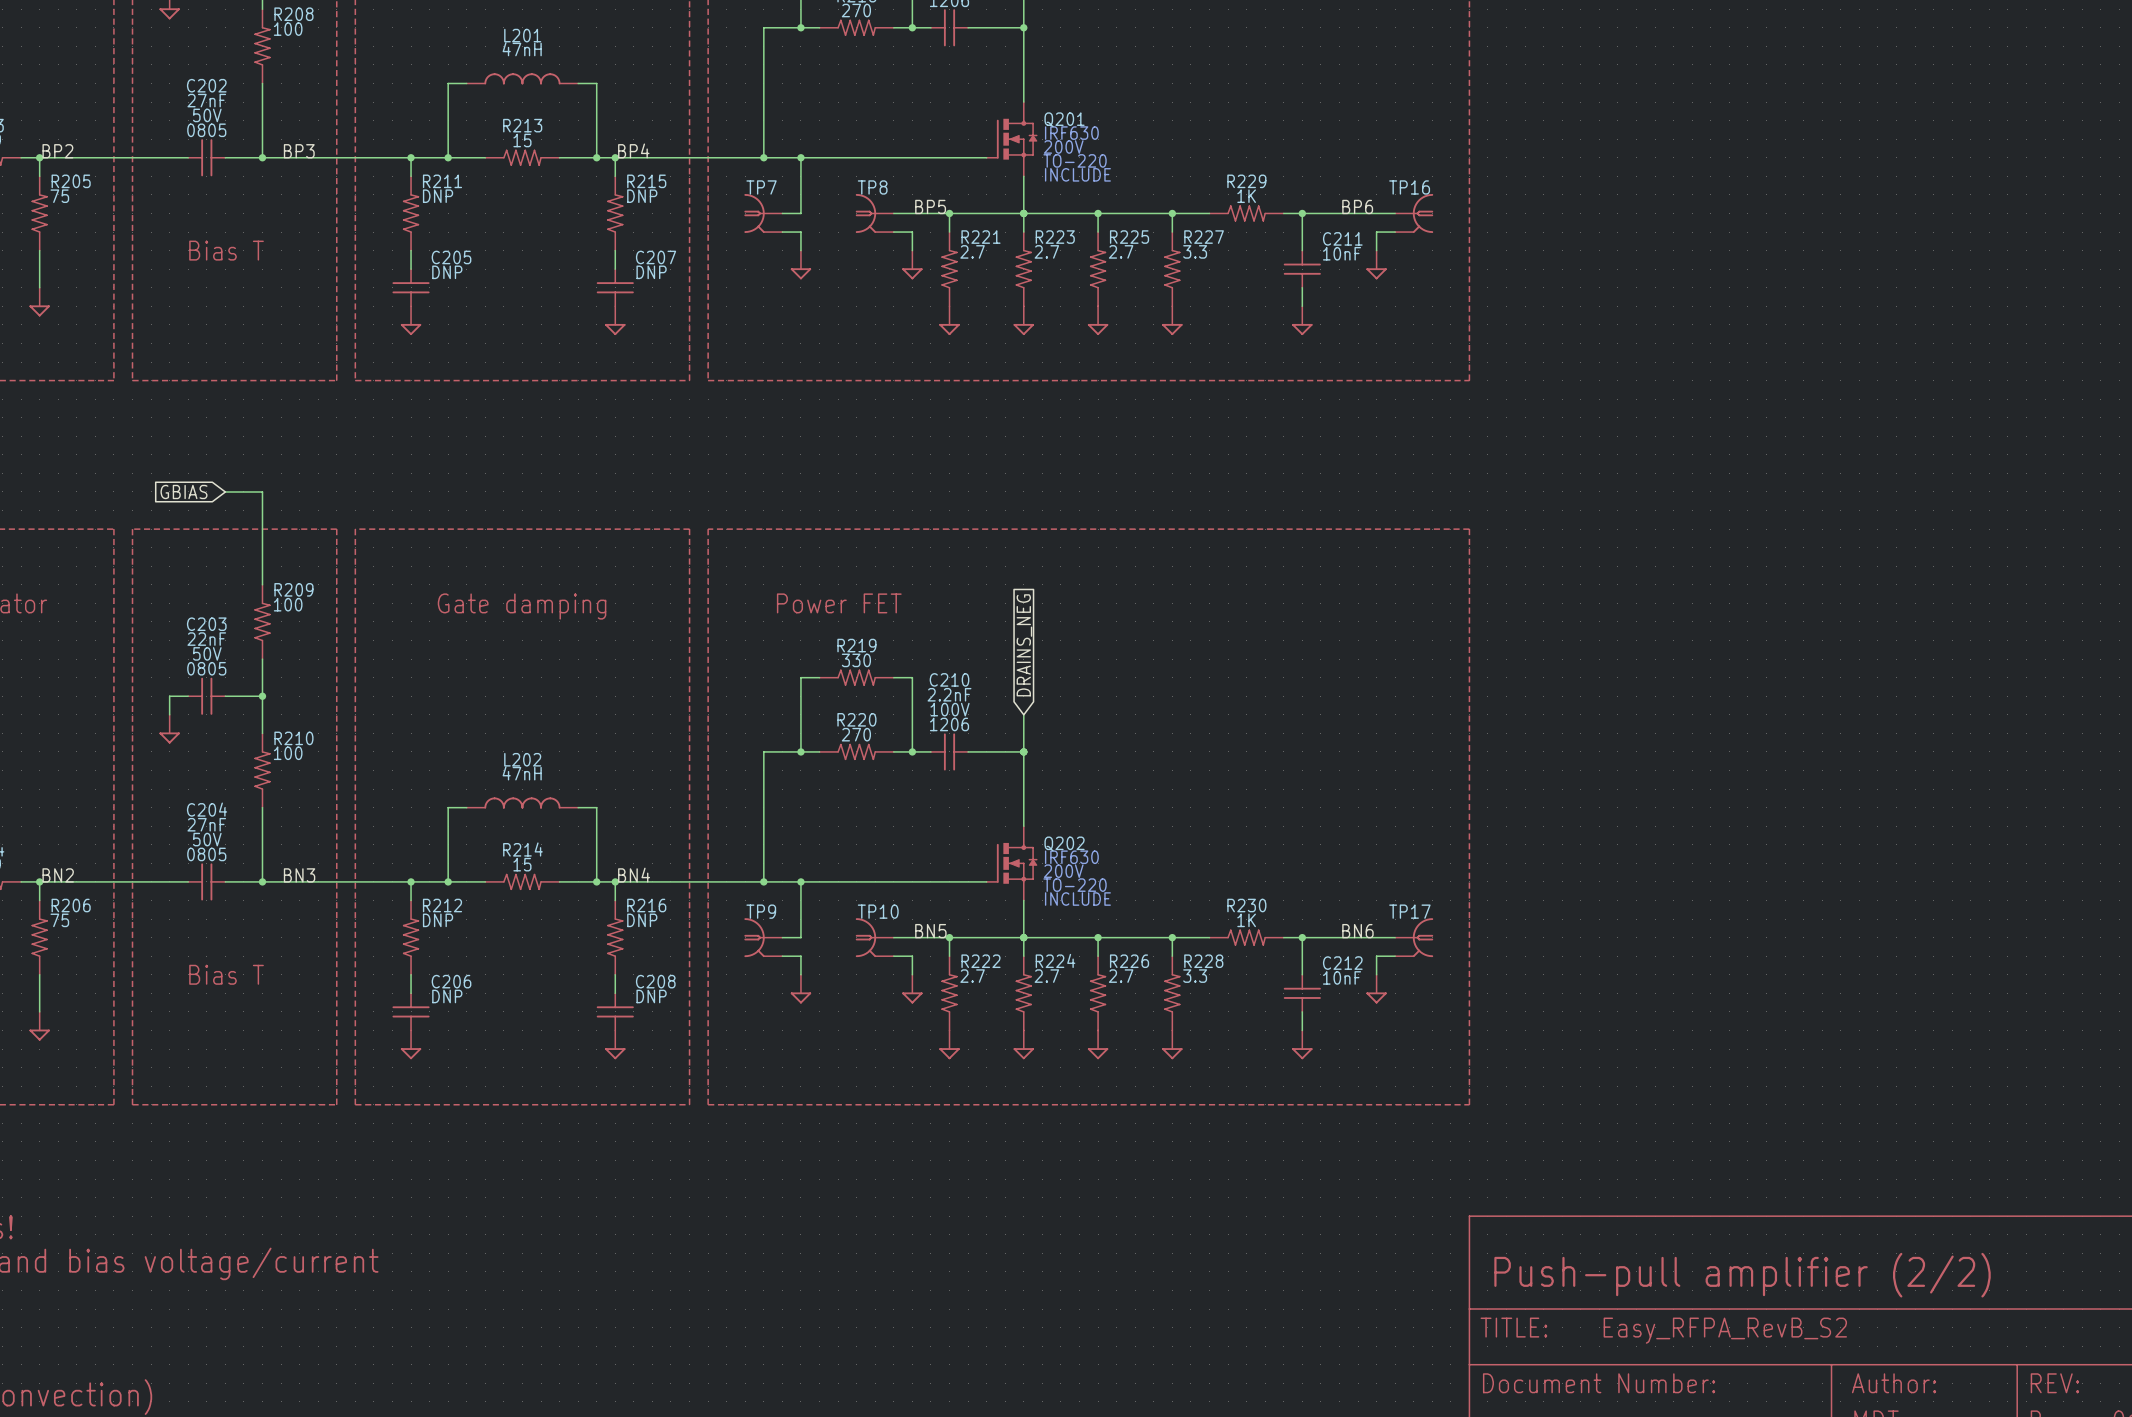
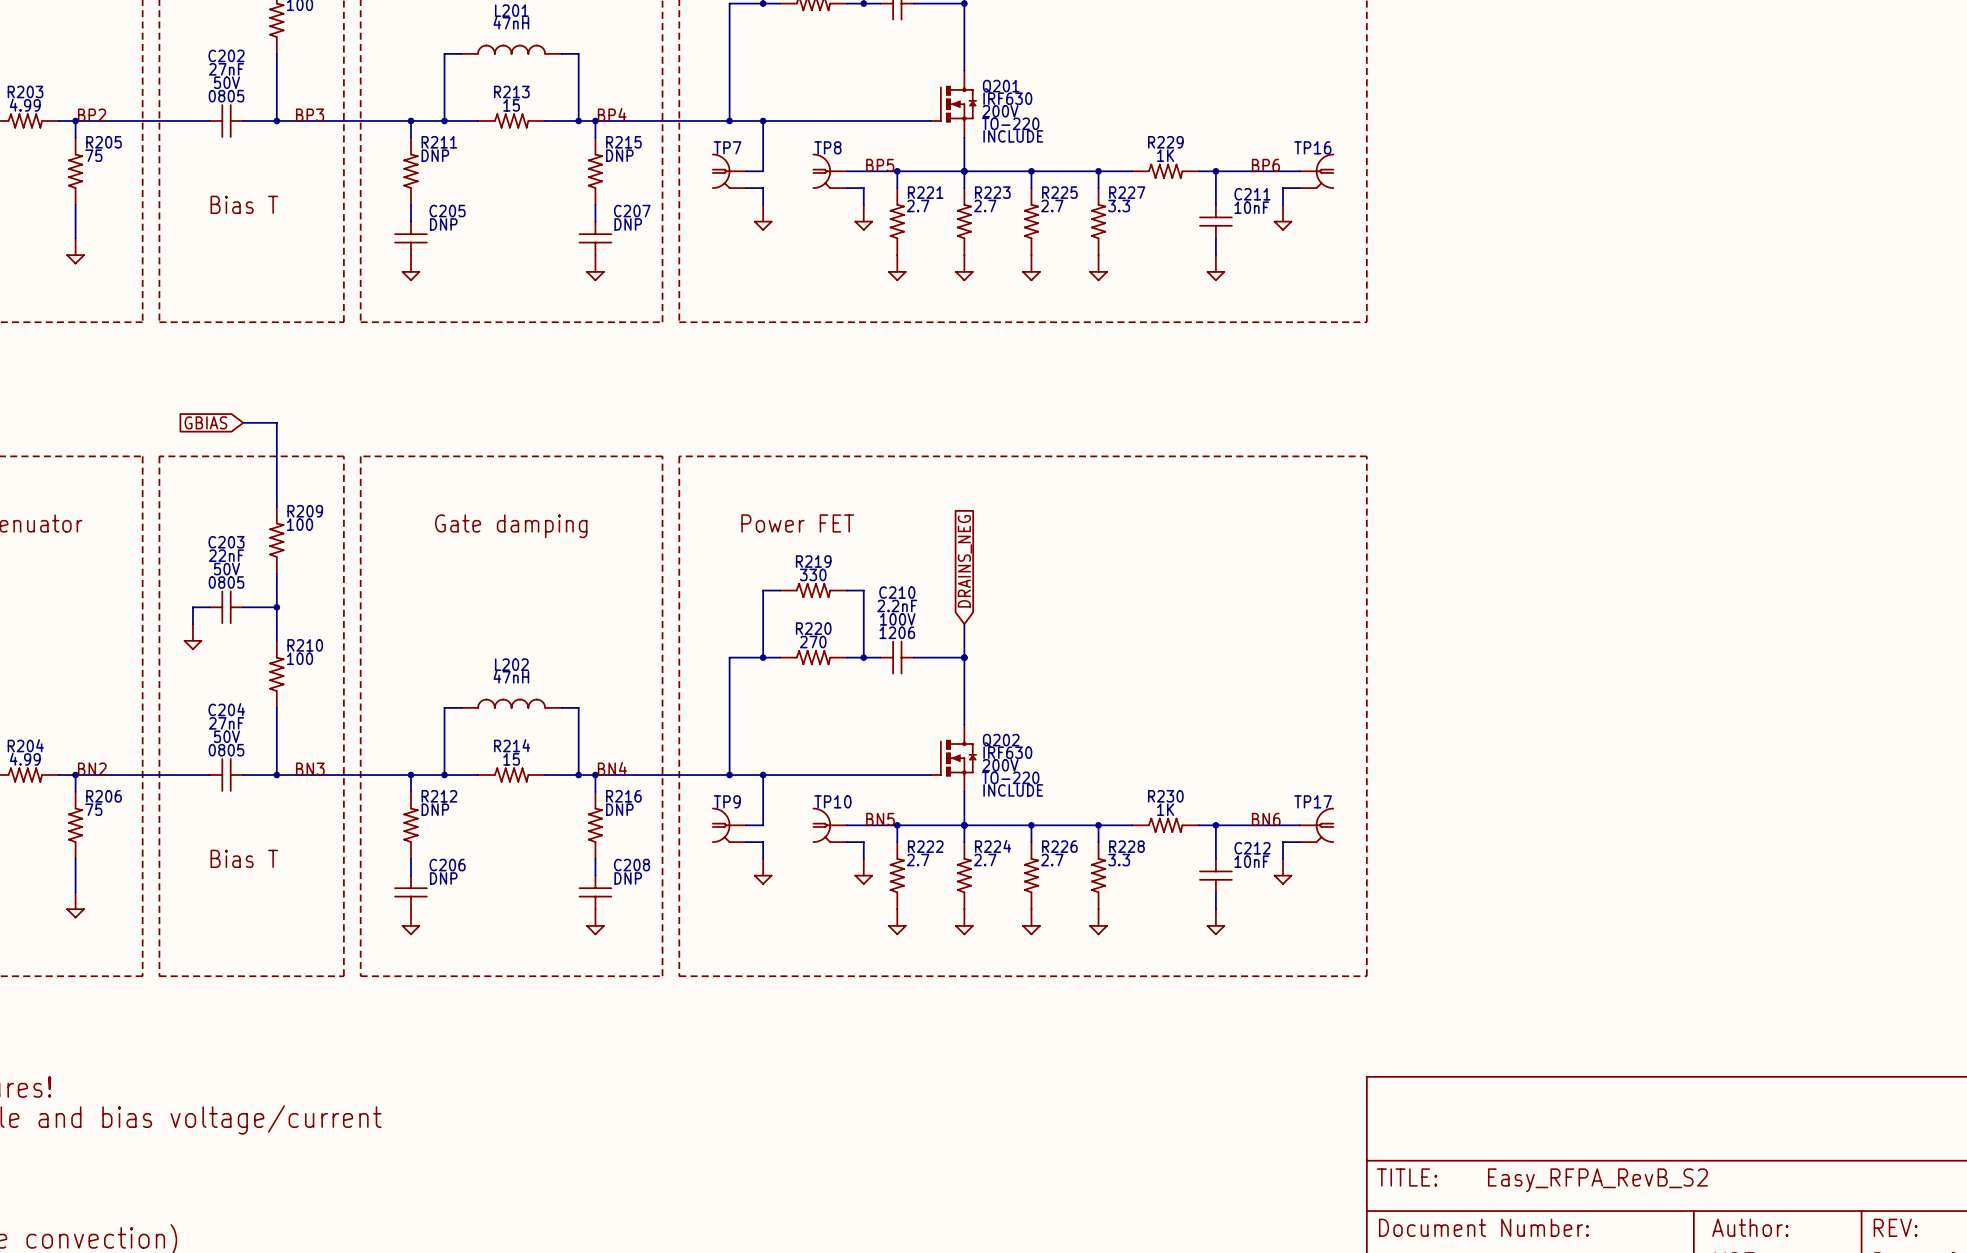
text: Push-pull amplifier (2/2) (1742, 1275) -> none

